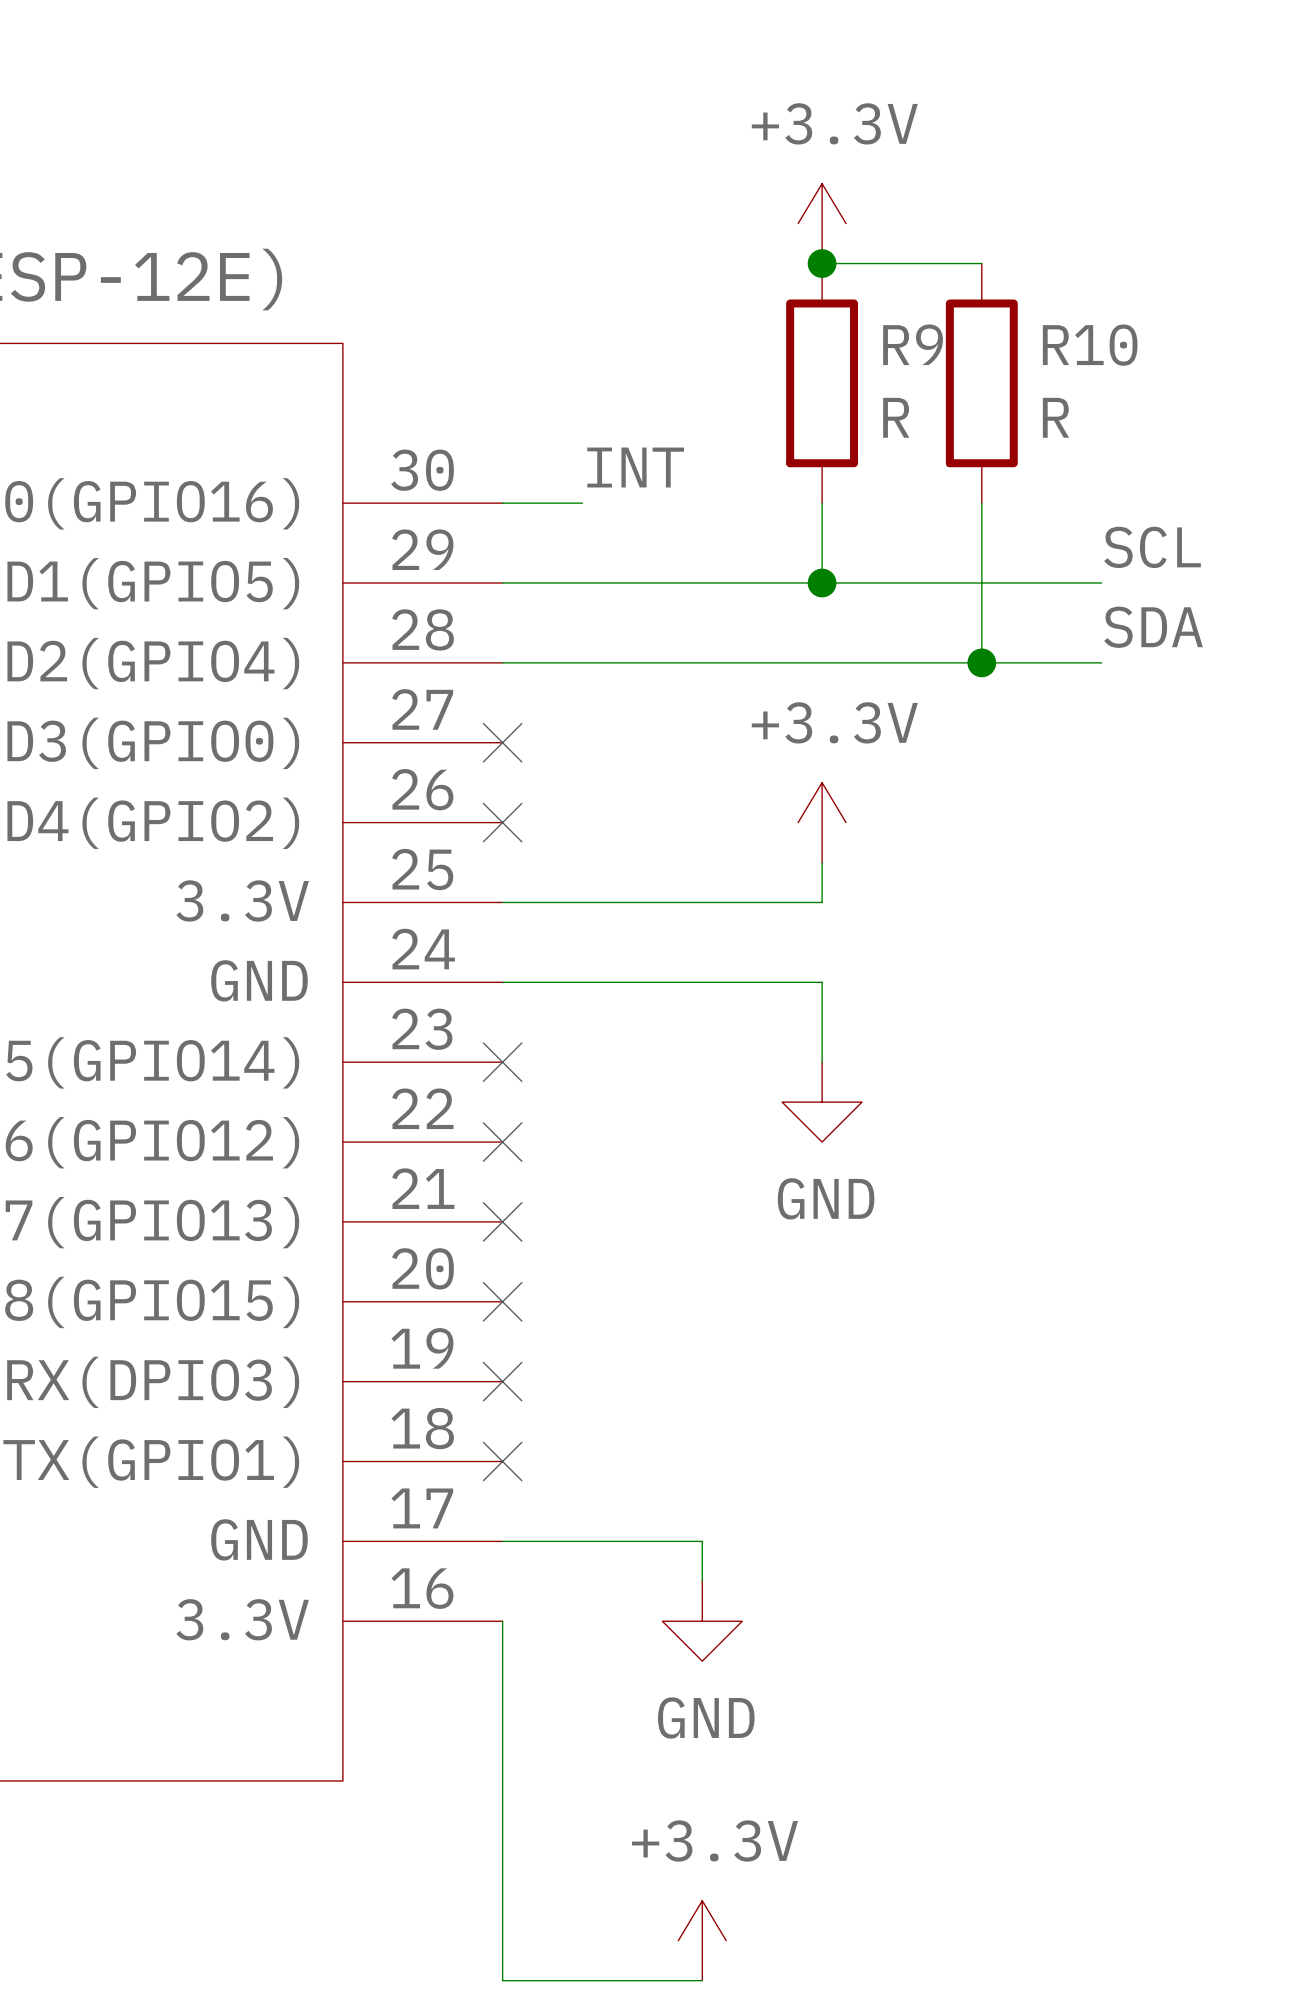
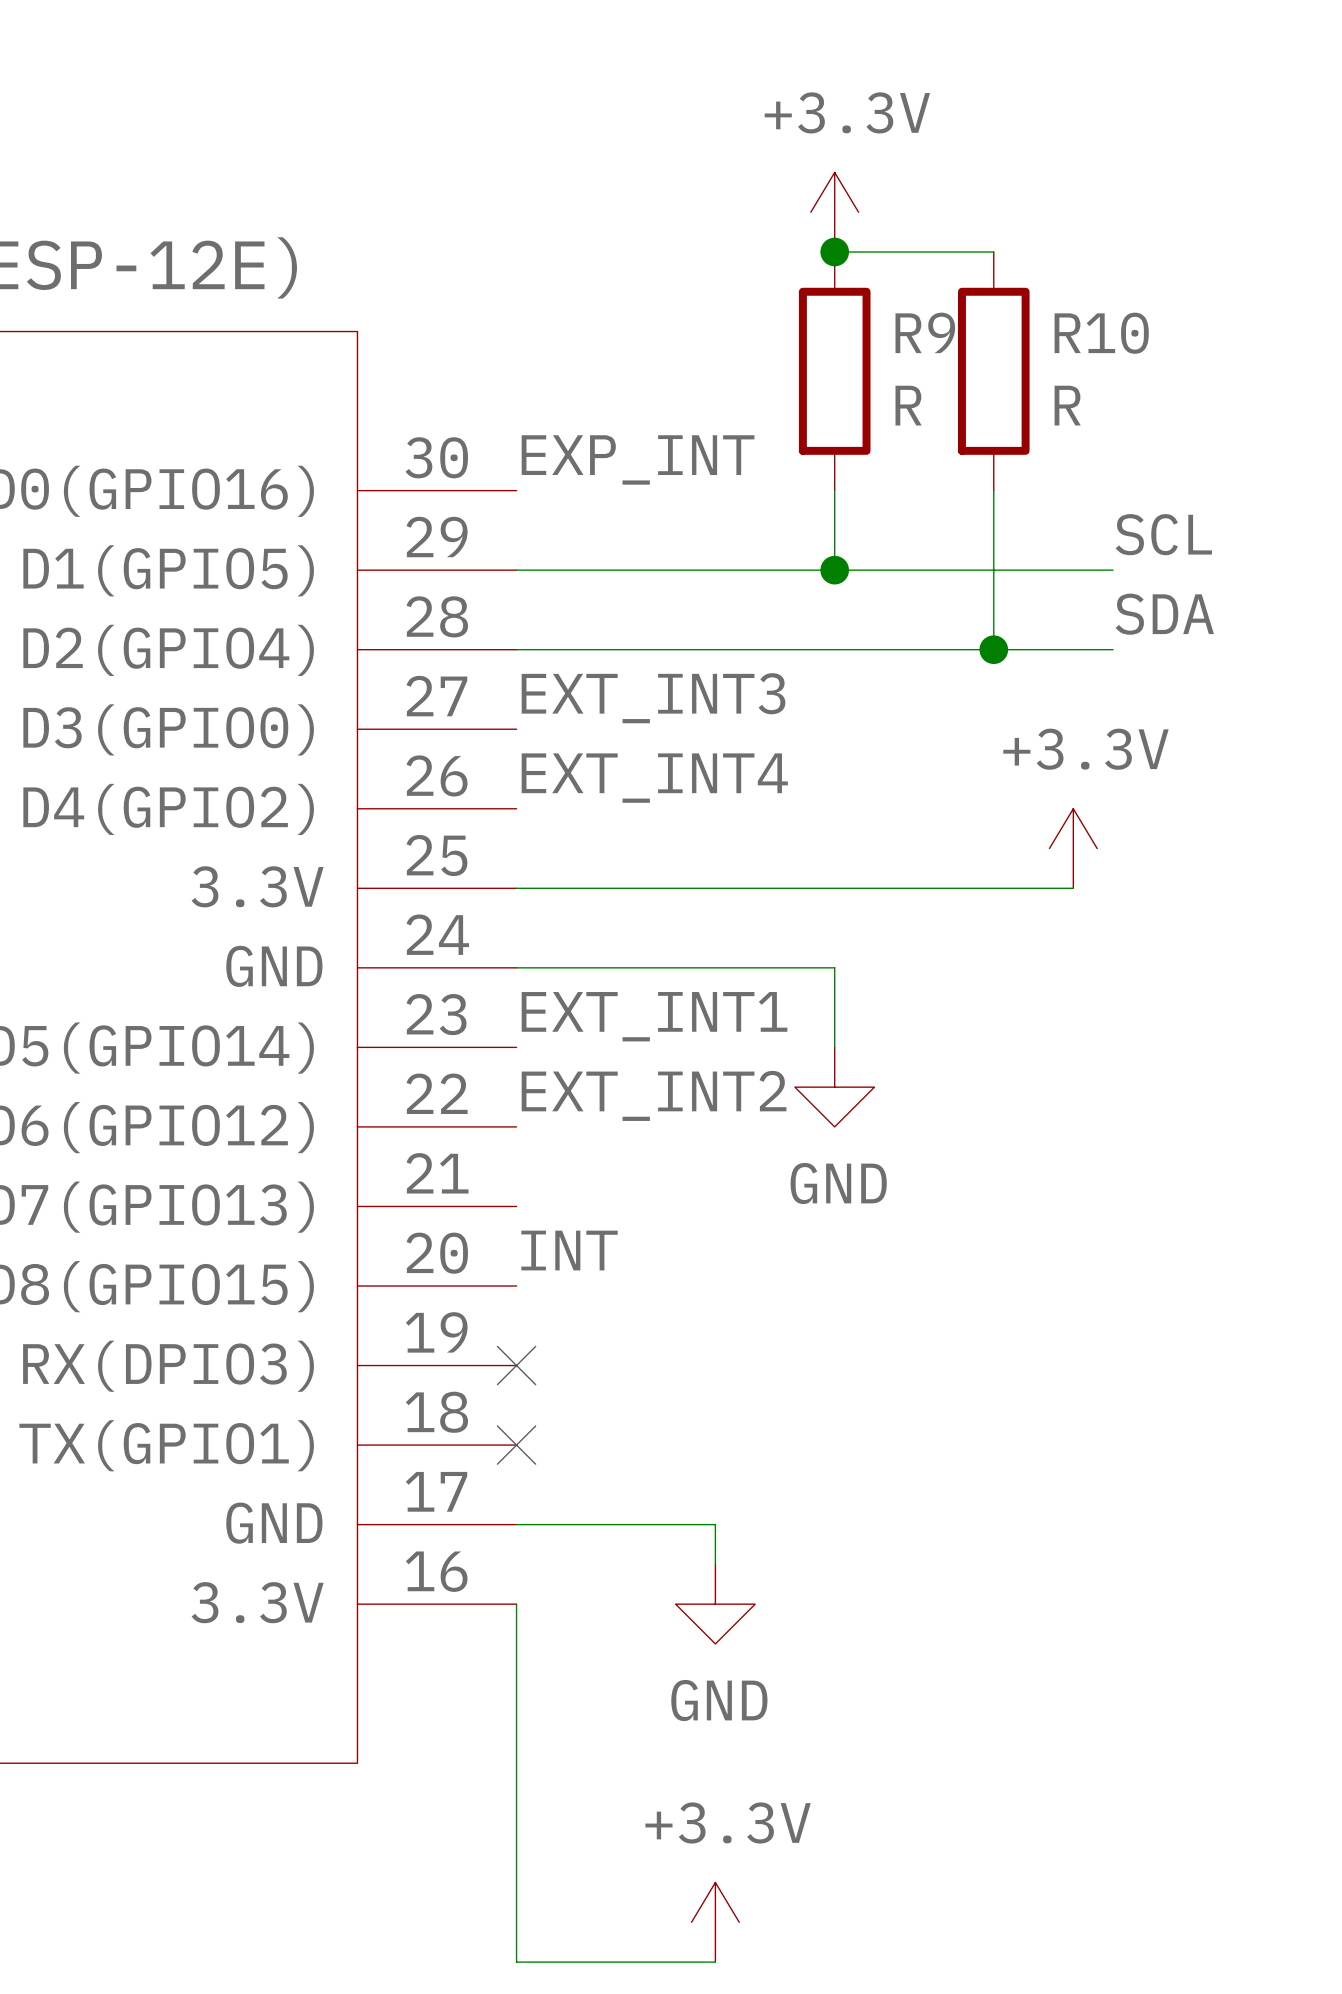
label: INT (635, 467) -> none
label: none -> EXP_INT (638, 459)
wire: (502, 503) (582, 503) -> none
label: none -> EXT_INT3 (653, 698)
no-connect mark: (502, 742) -> none
label: none -> EXT_INT4 (654, 778)
no-connect mark: (502, 822) -> none
power symbol position: +3.3V (822, 822) -> +3.3V (1073, 848)
wire: (822, 862) (822, 902) -> (1073, 888) (834, 888)
label: none -> EXT_INT1 (654, 1016)
no-connect mark: (502, 1062) -> none
label: none -> EXT_INT2 (654, 1095)
no-connect mark: (502, 1142) -> none
no-connect mark: (502, 1221) -> none
label: none -> INT (569, 1250)
no-connect mark: (502, 1301) -> none

